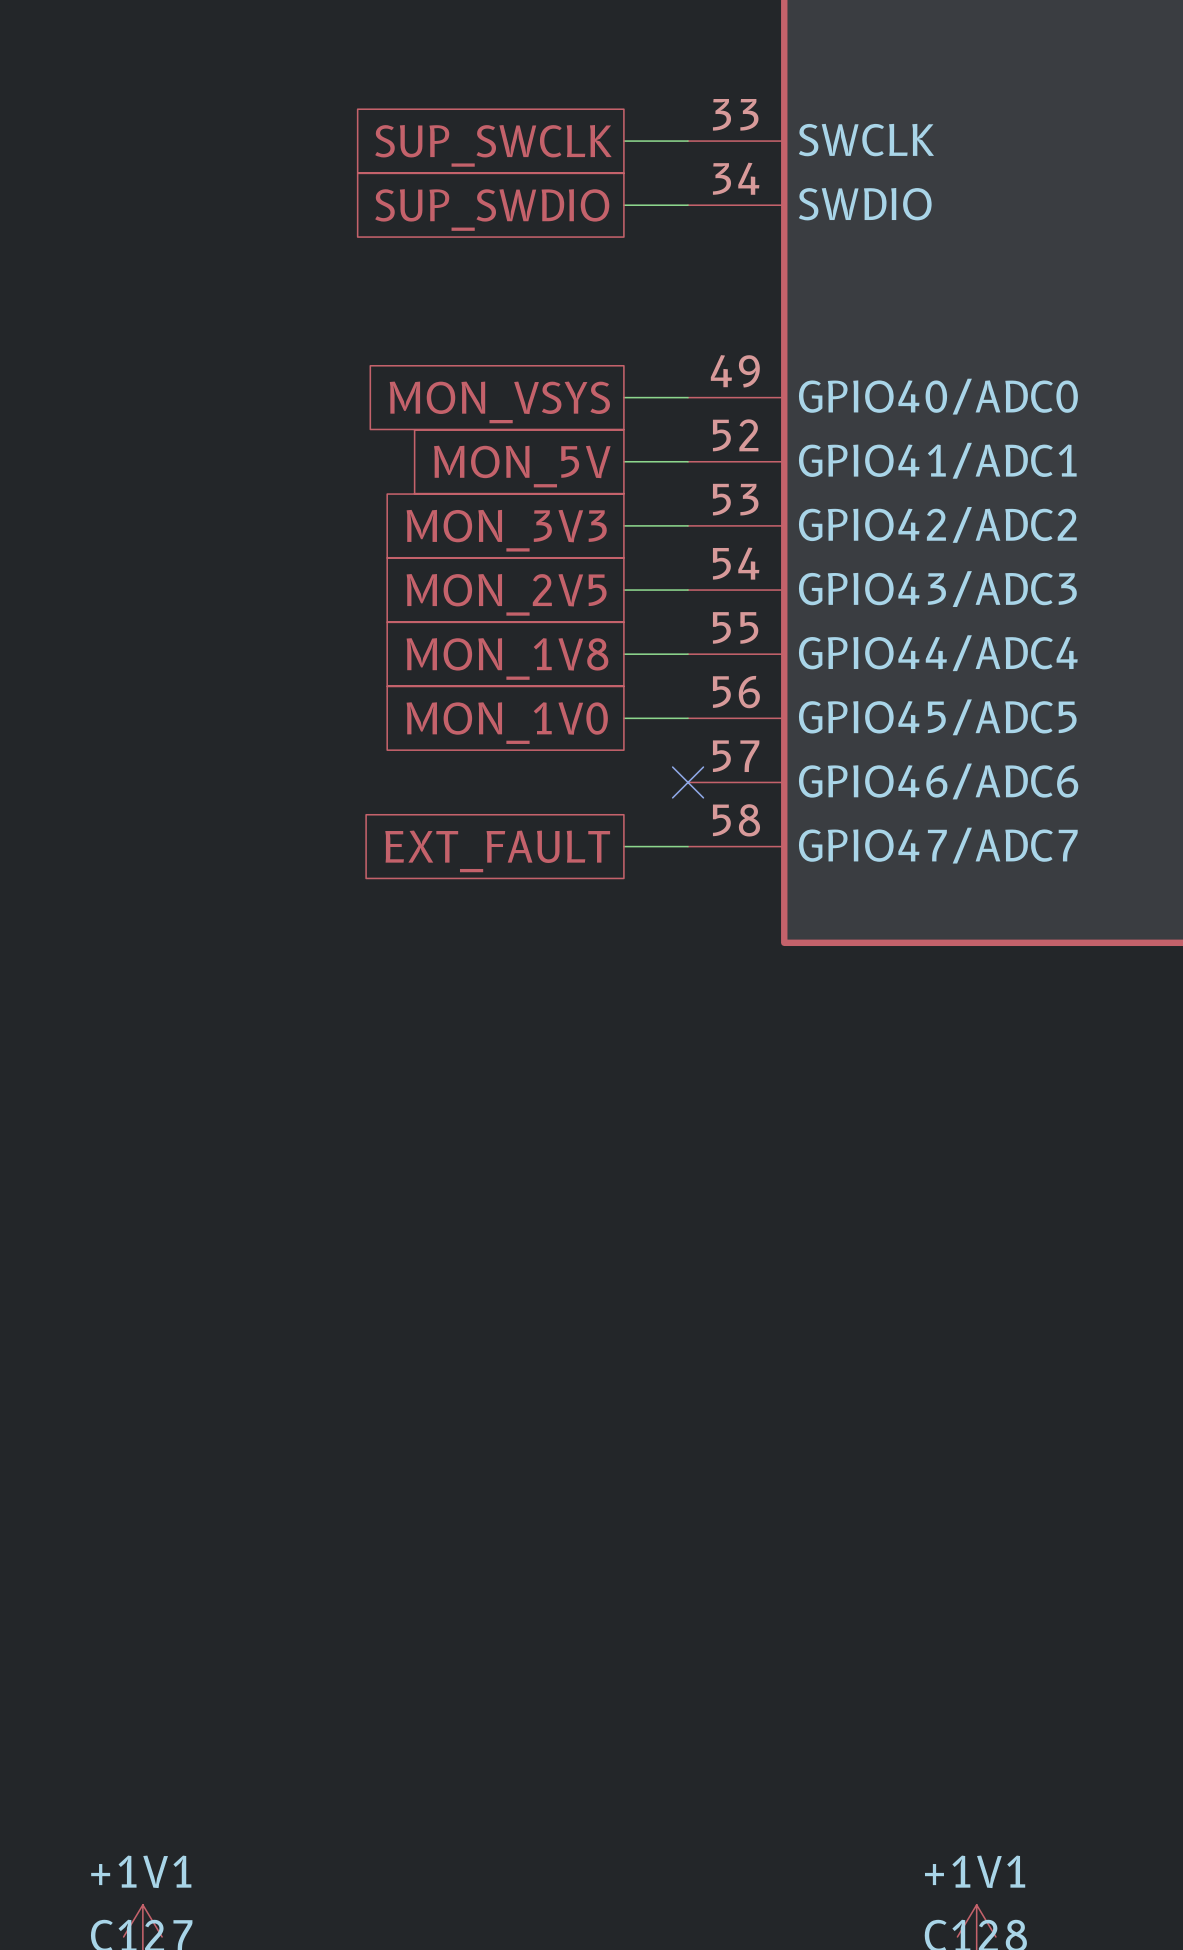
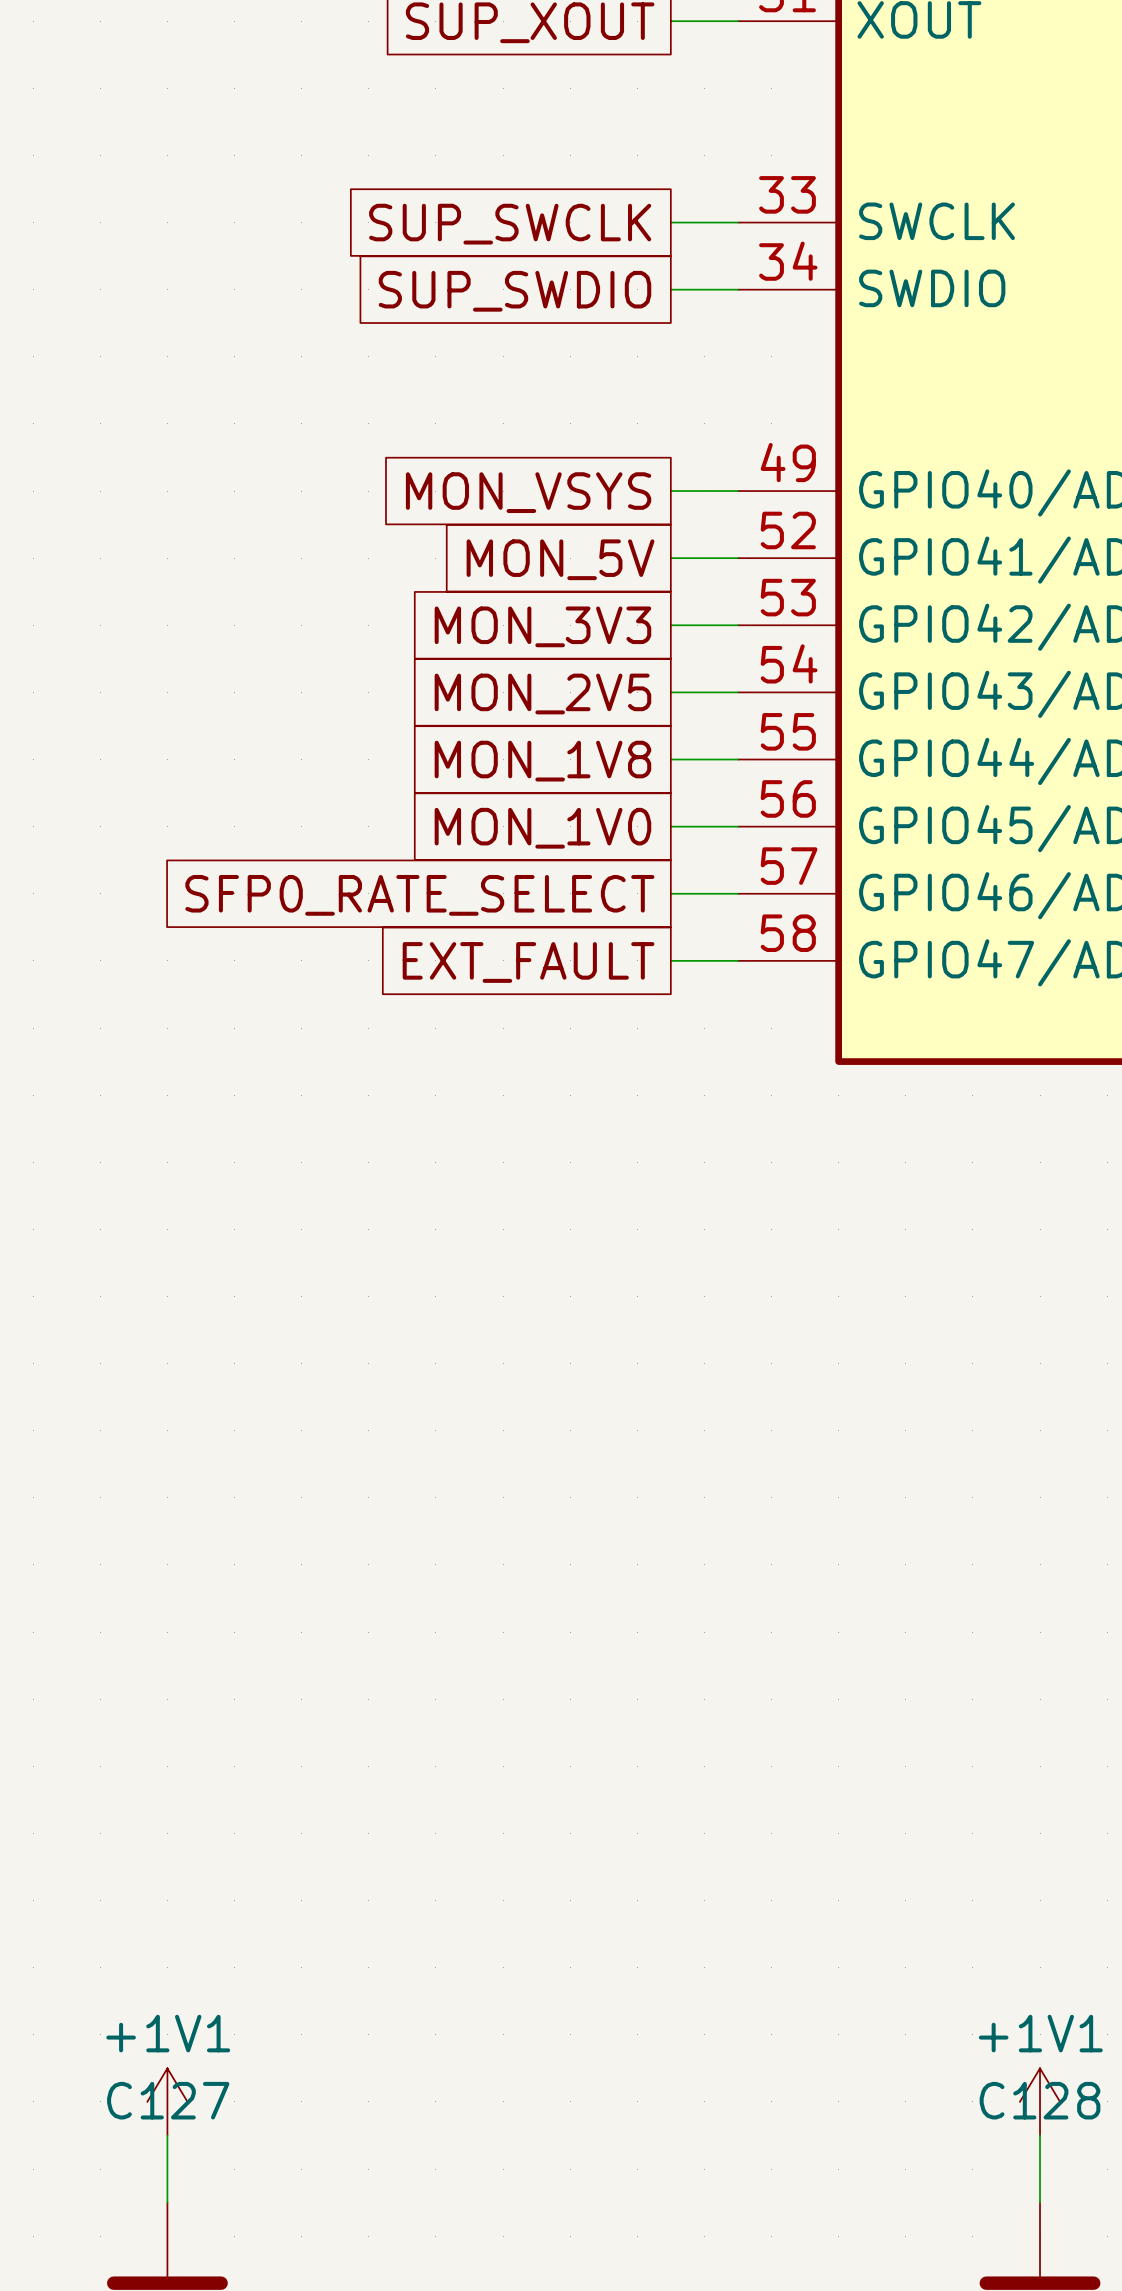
wire: none -> (670, 893) (737, 893)
no-connect mark: (688, 782) -> none
global label: none -> SFP0_RATE_SELECT (419, 895)

